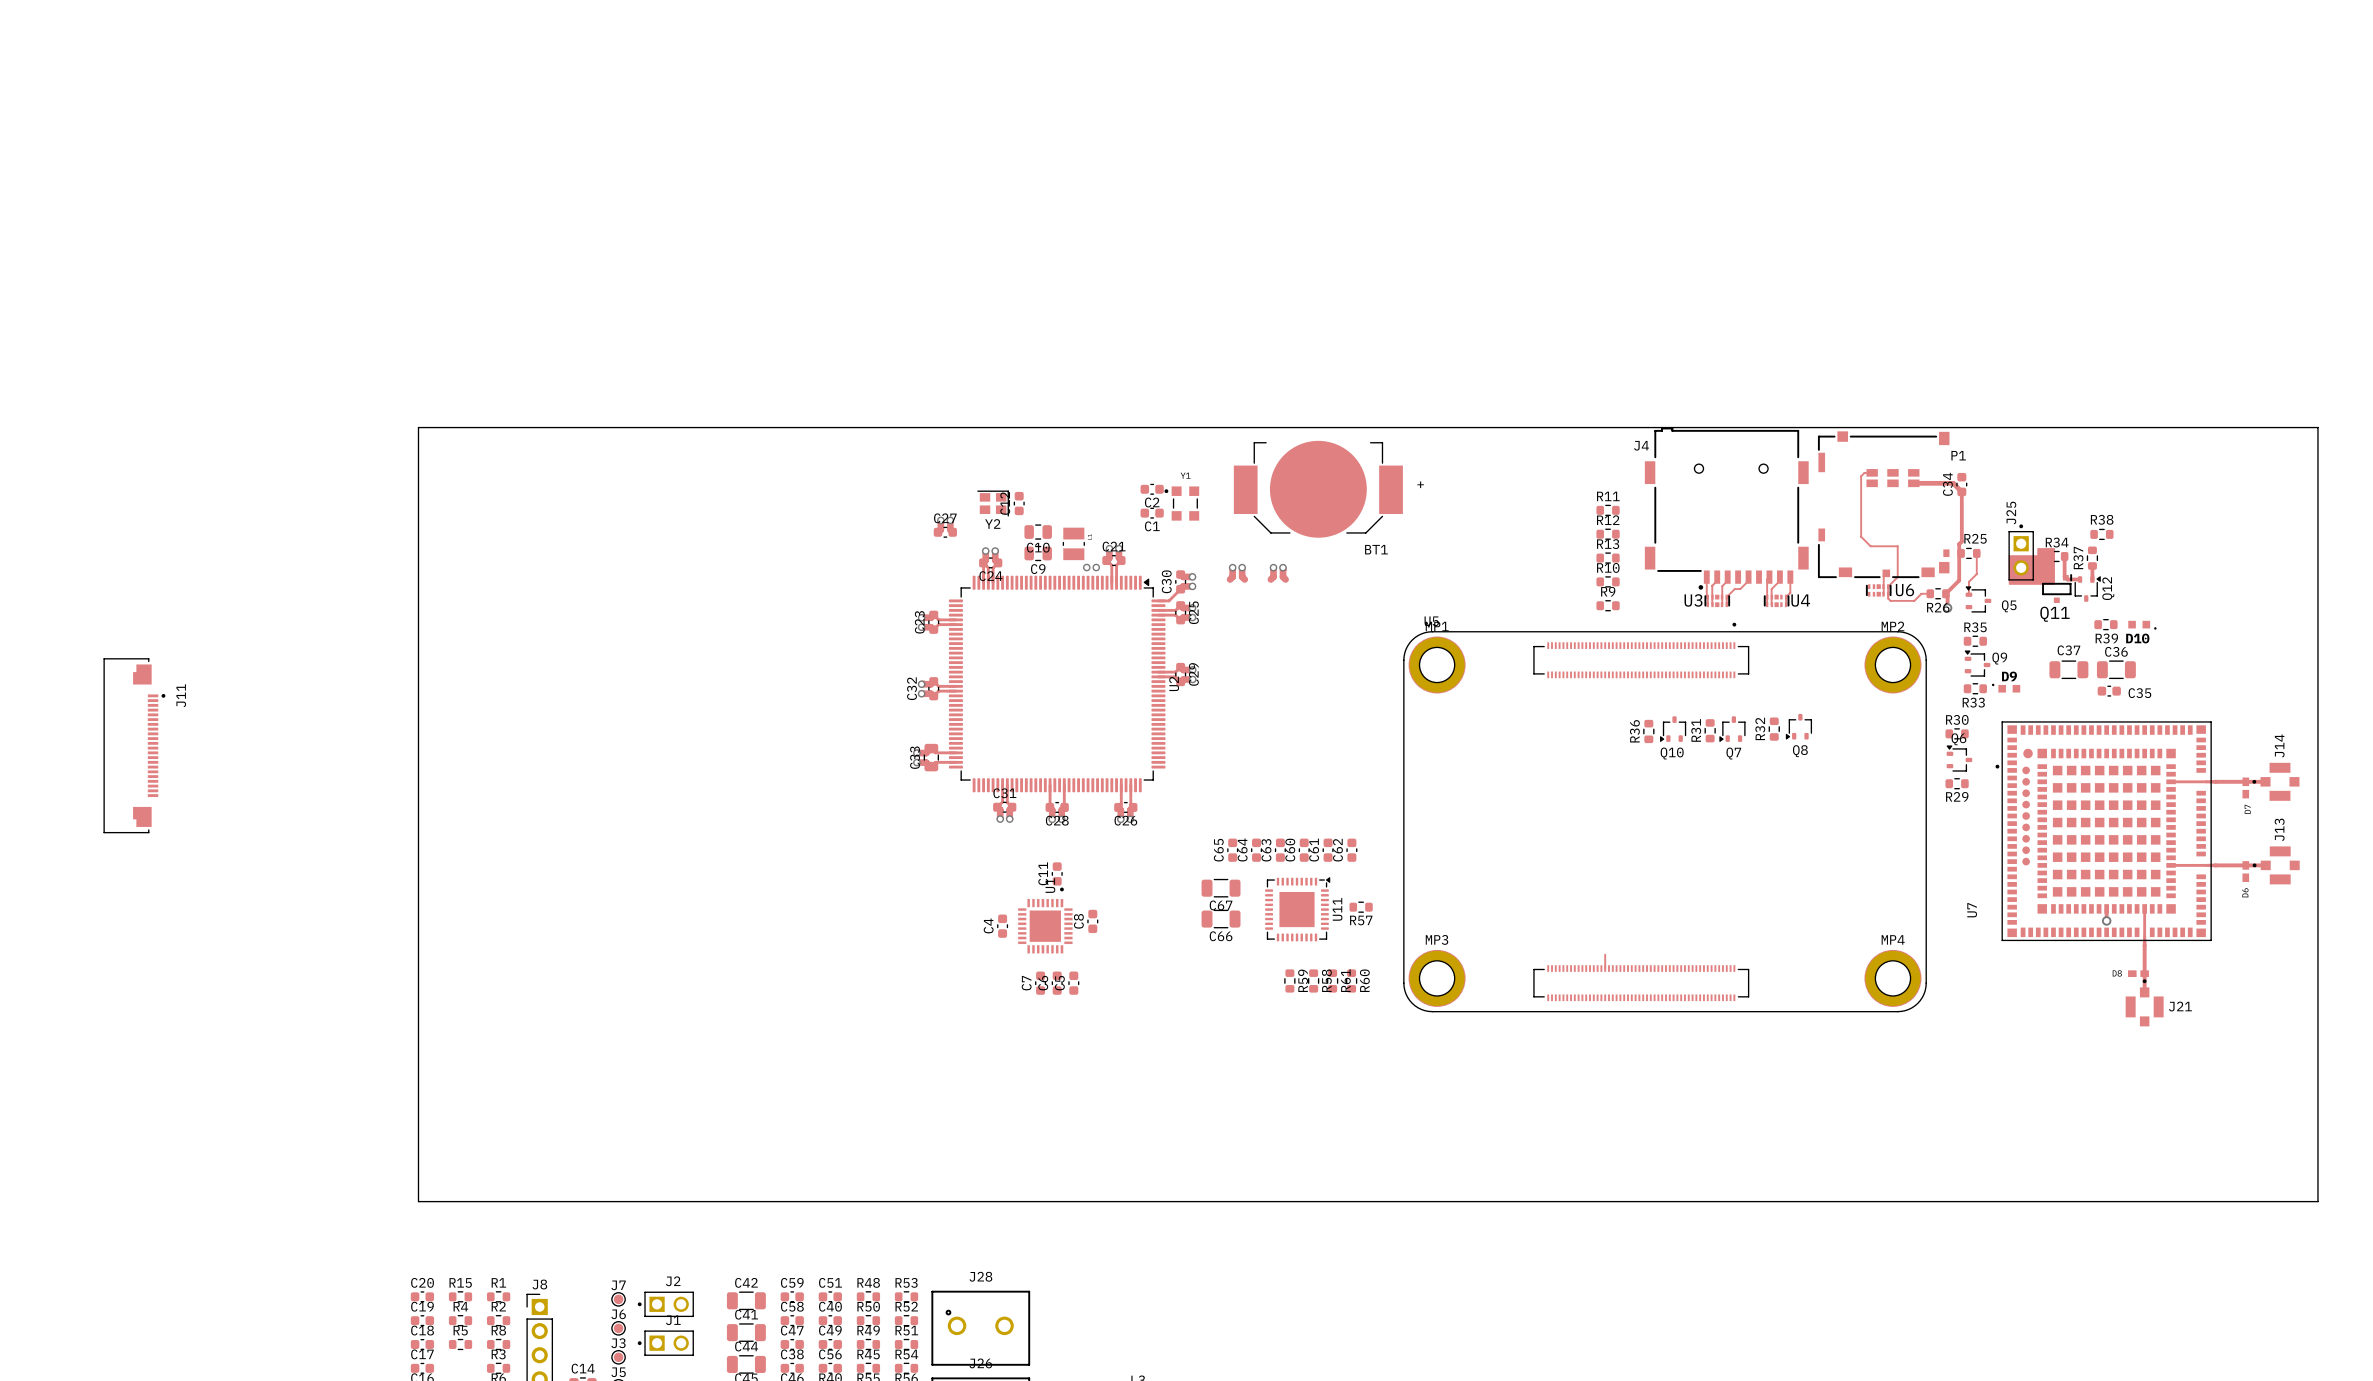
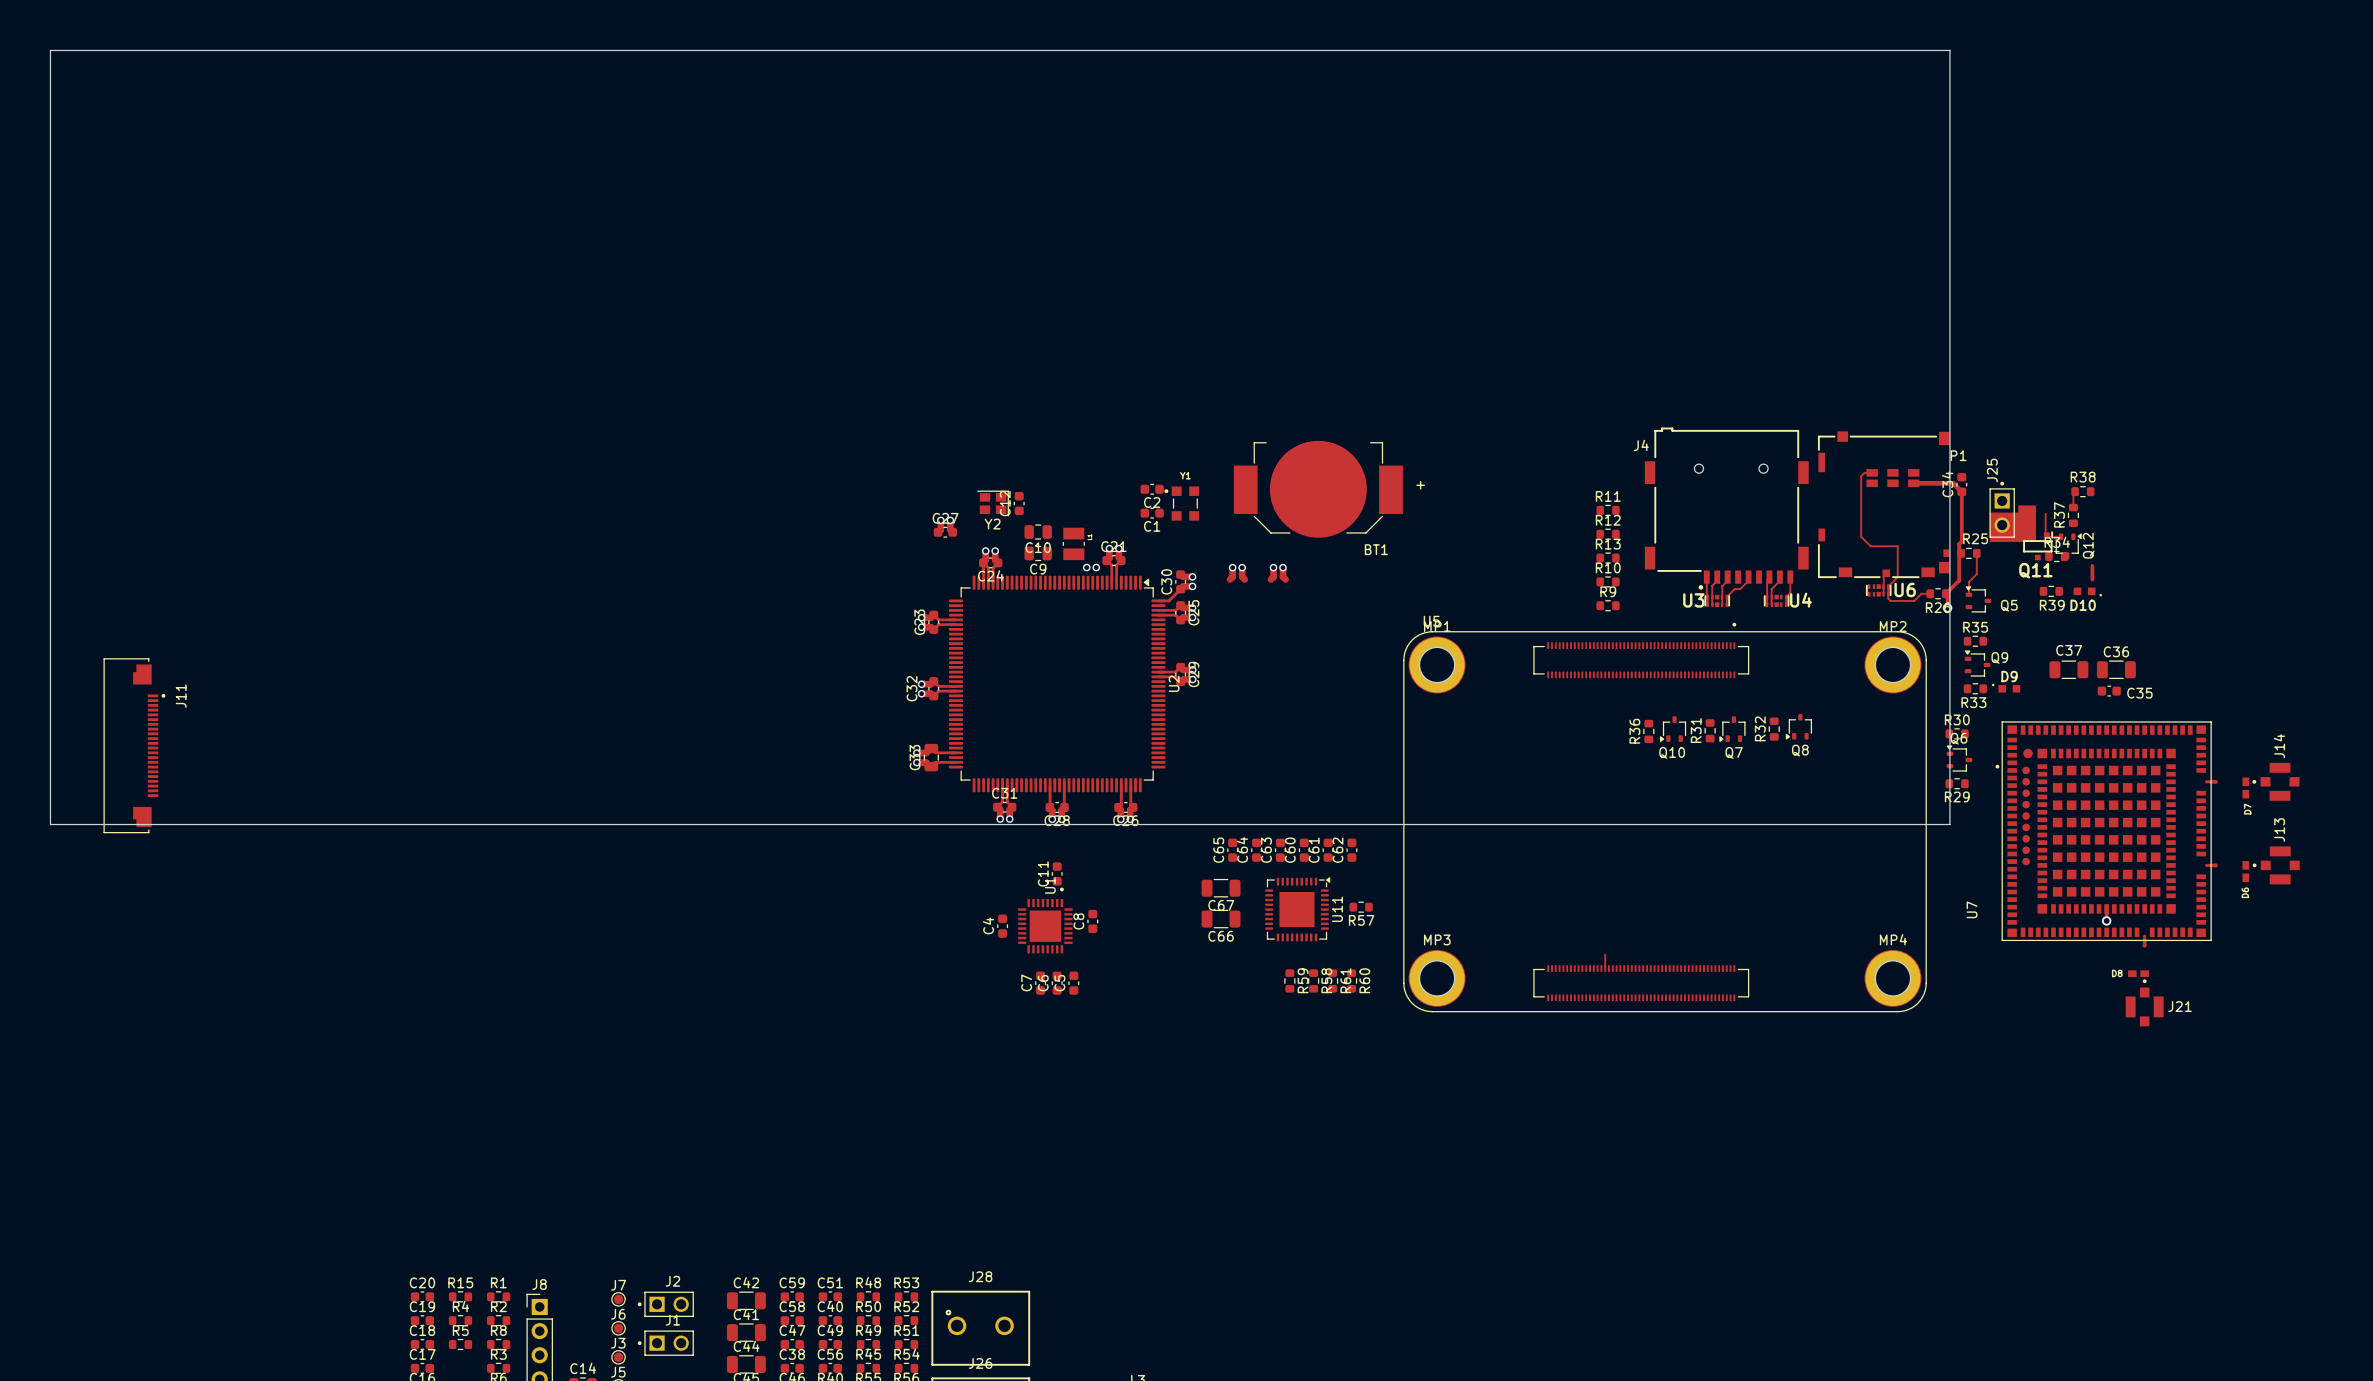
board edge: none -> (50, 50) (1949, 50) (1949, 824) (50, 824) (50, 50)
board edge: (418, 427) (2317, 427) (2317, 1201) (418, 1201) (418, 427) -> none
track: none -> (2075, 491) (2073, 507)
R38 position: (2101, 534) -> (2082, 491)
J25 position: (2021, 552) -> (2002, 509)
track: (2064, 556) (2064, 576) (2067, 579) (2080, 579) -> (2045, 513) (2045, 533) (2048, 536) (2061, 536)
R37 position: (2092, 558) -> (2073, 515)
drawing position: (2031, 566) -> (2012, 523)
Q11 position: (2057, 588) -> (2038, 545)
Q12 position: (2087, 589) -> (2068, 546)
R39 position: (2105, 624) -> (2051, 591)
D10 position: (2142, 625) -> (2087, 591)
track: (2171, 781) (2206, 781) -> none
track: (2215, 781) (2265, 781) -> none
track: (2171, 865) (2206, 865) -> none
track: (2215, 865) (2265, 865) -> none
track: (2144, 908) (2144, 936) -> none
track: (2144, 945) (2144, 992) -> none

